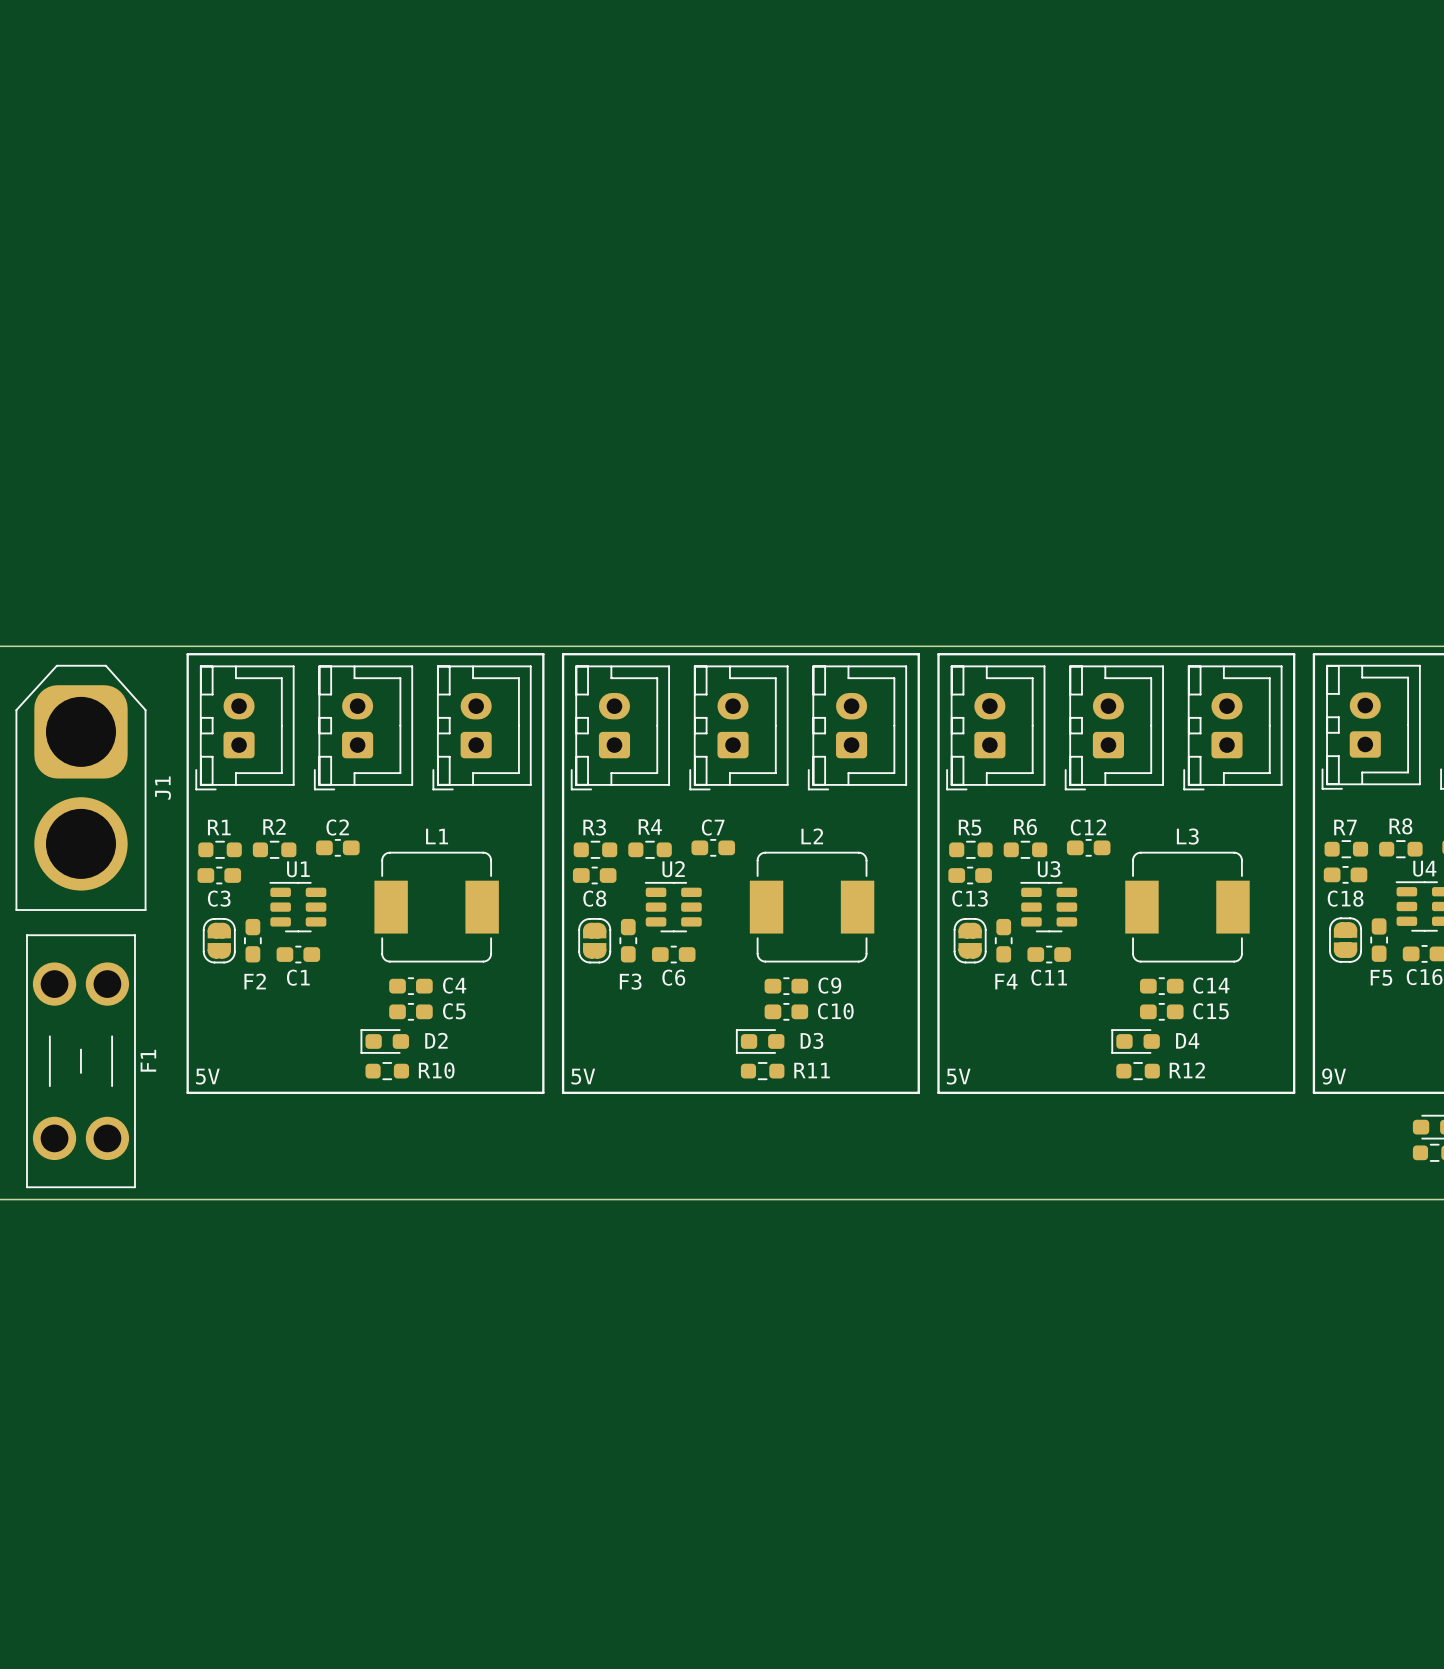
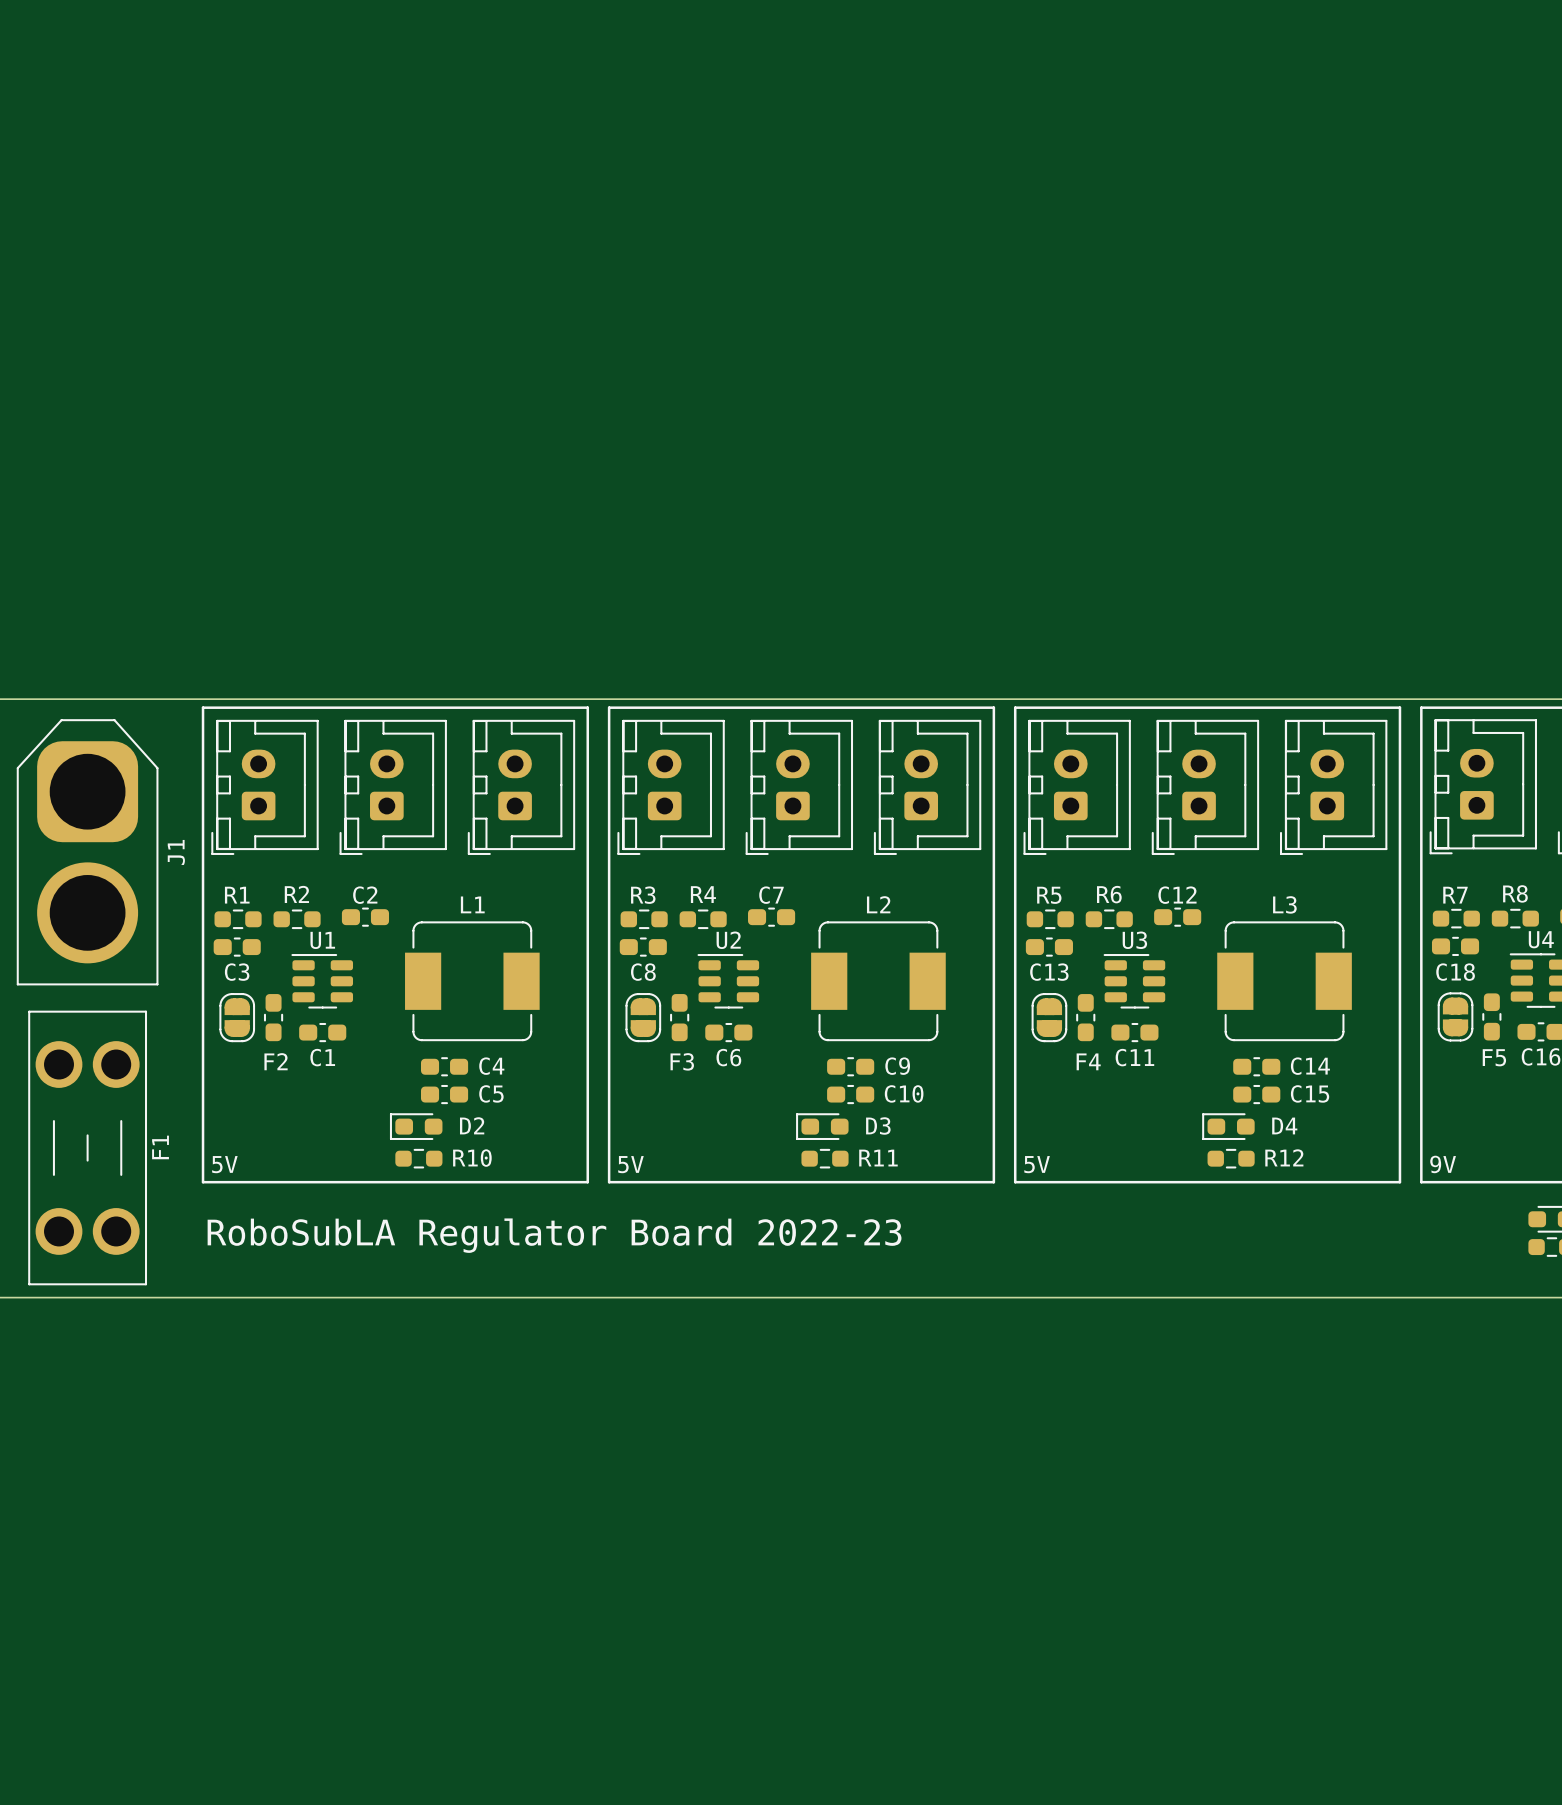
text: none -> RoboSubLA Regulator Board 2022-23 (554, 1235)

